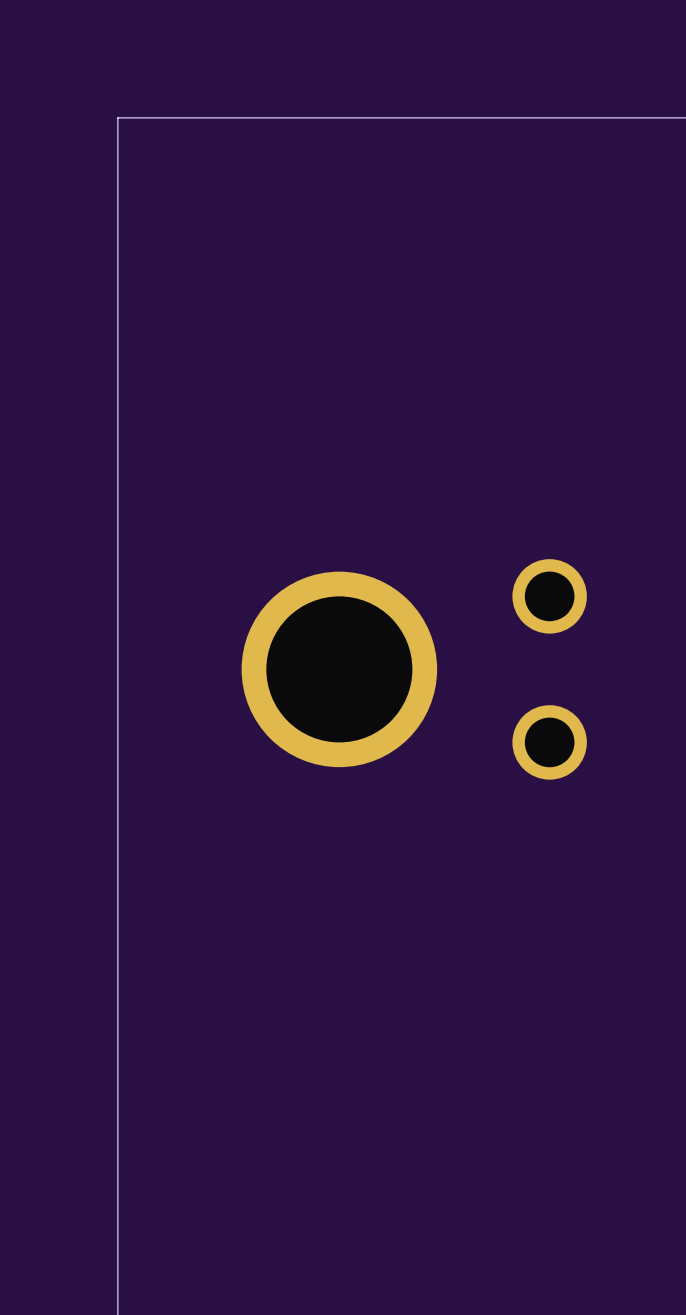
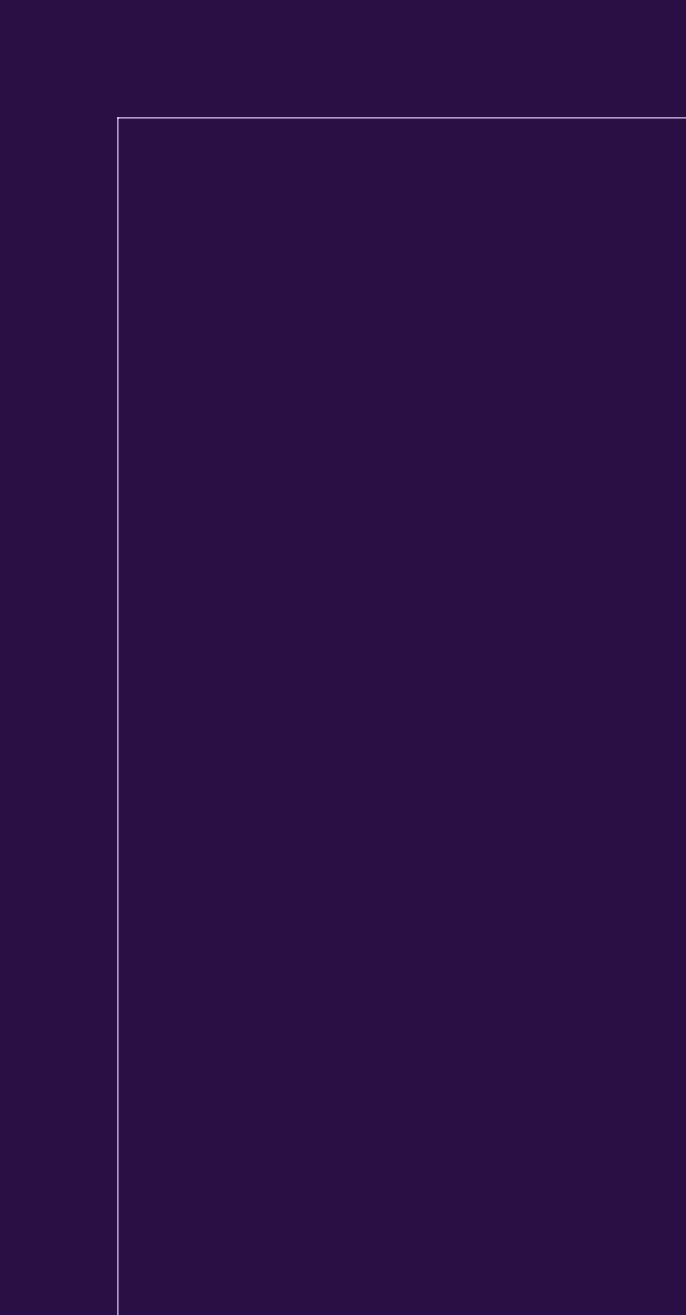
part: (414, 669) -> none

